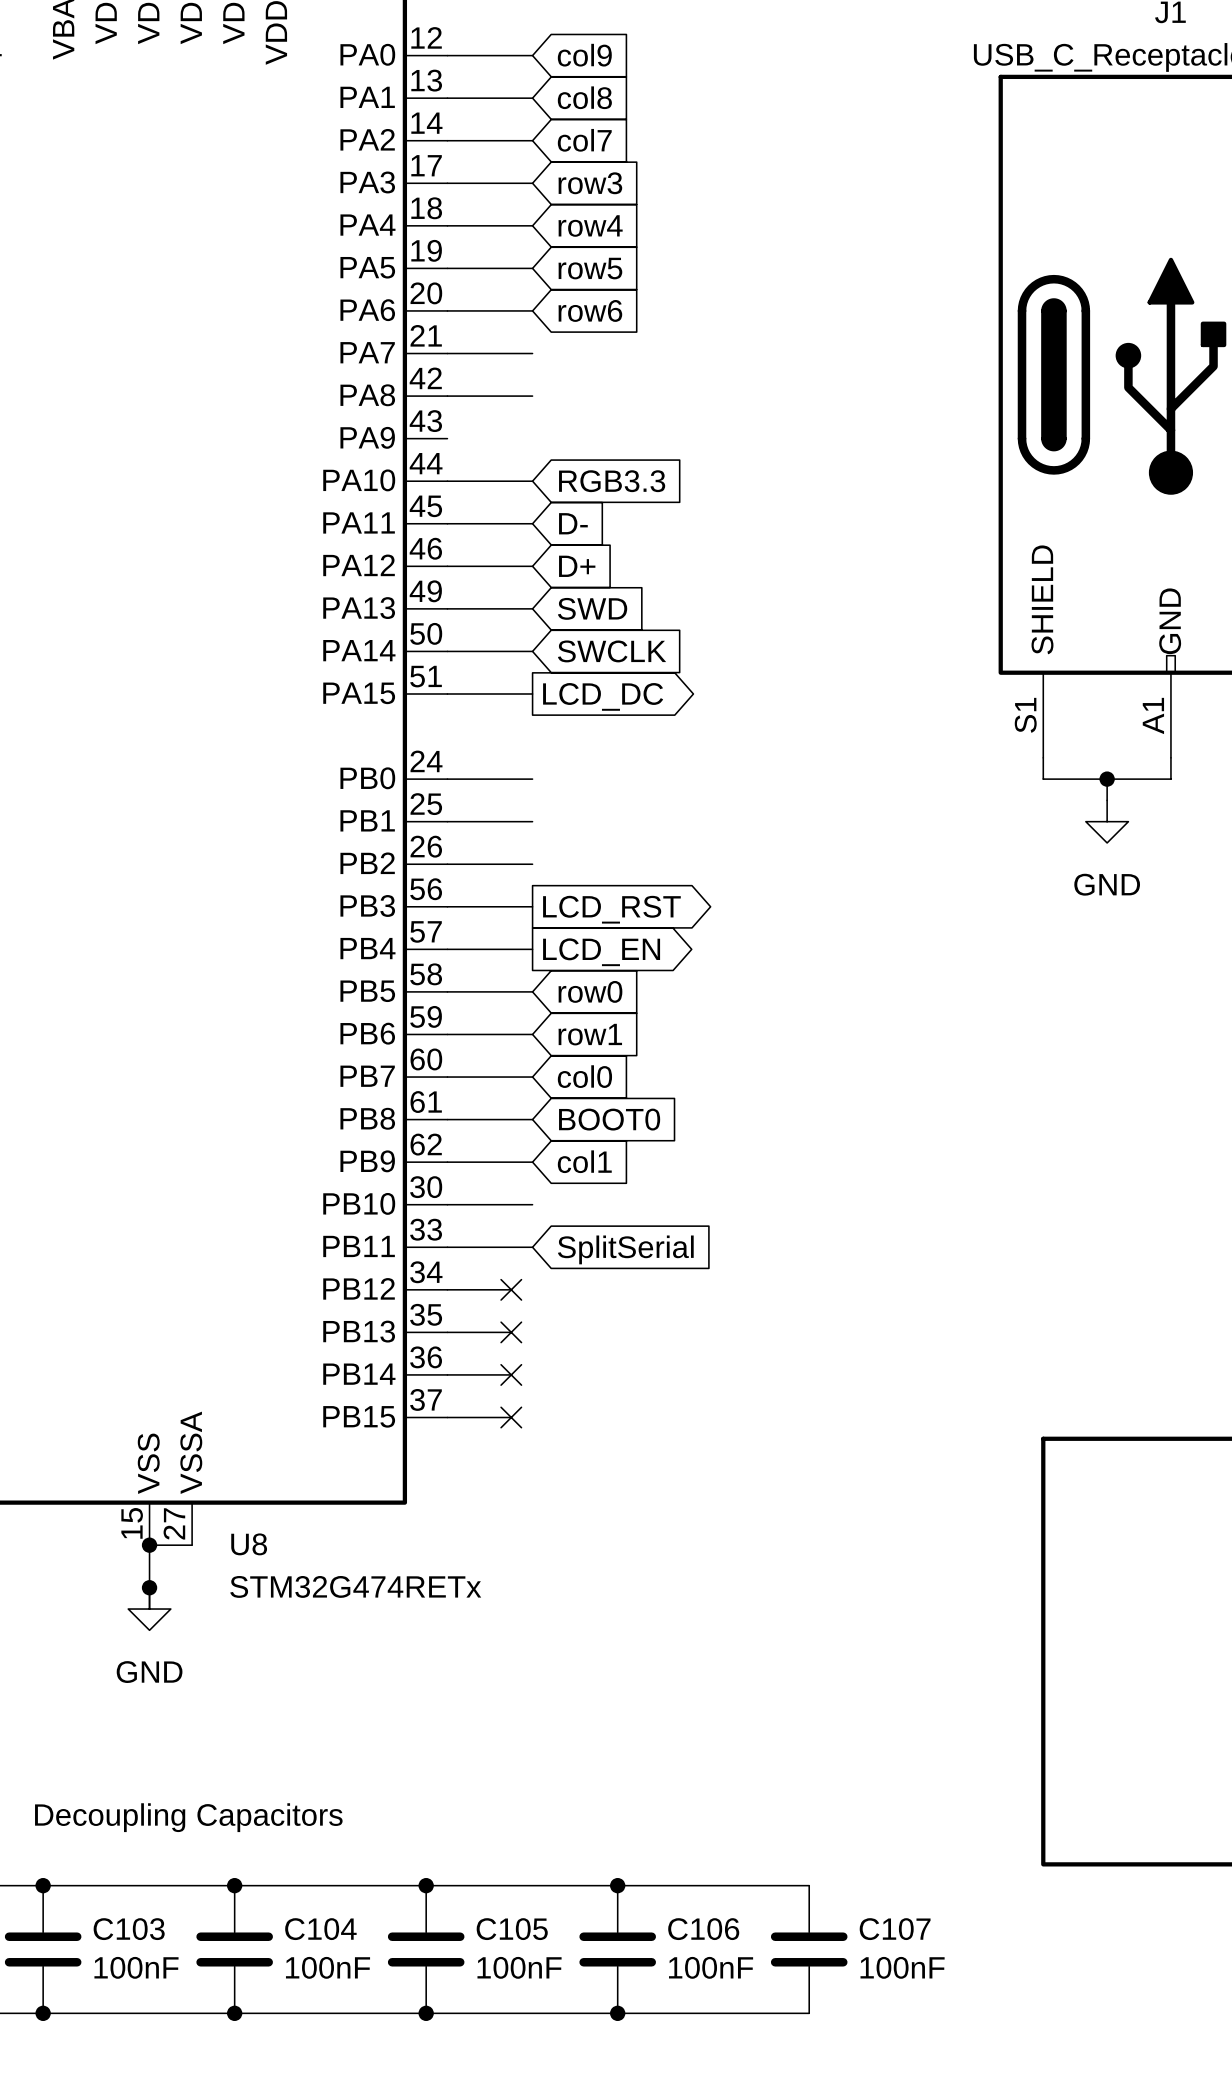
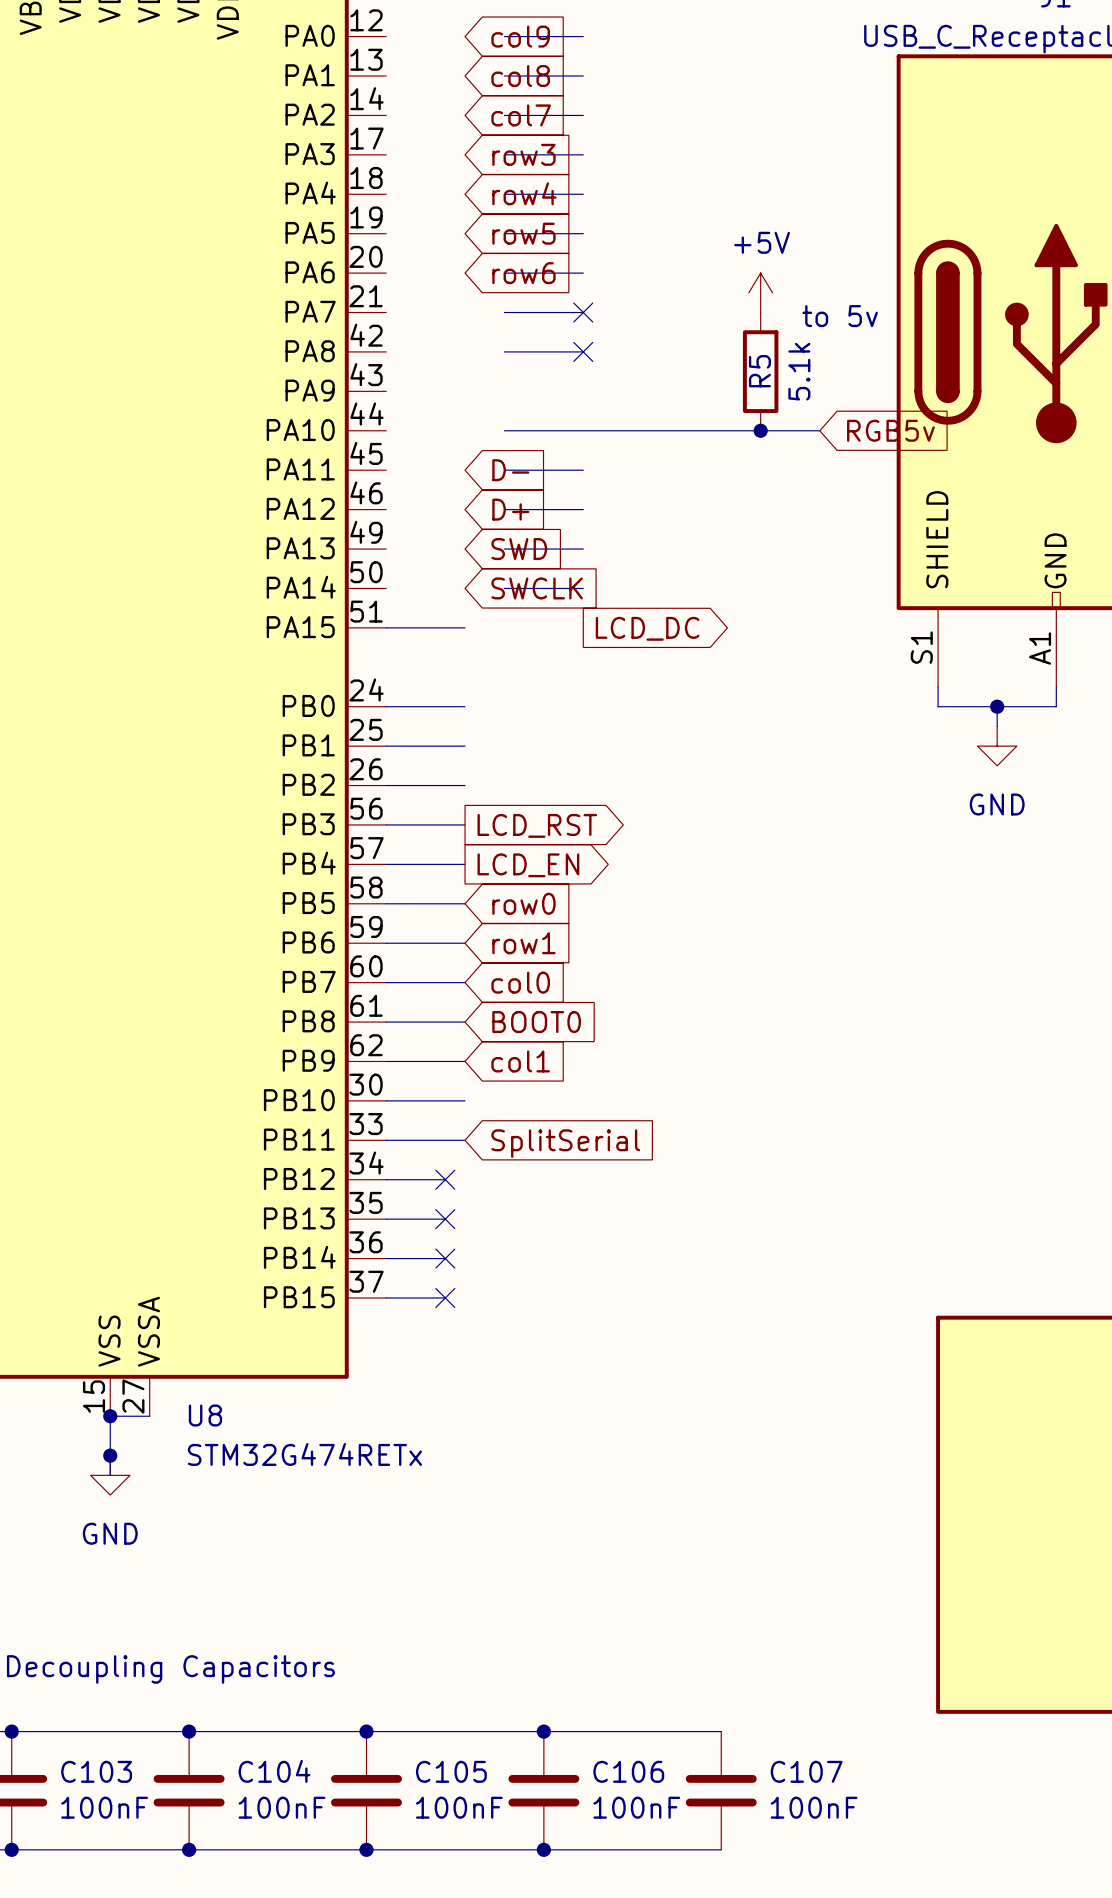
wire: (447, 55) (532, 55) -> (504, 36) (583, 36)
wire: (447, 98) (532, 98) -> (504, 76) (583, 76)
wire: (447, 140) (532, 140) -> (504, 115) (583, 115)
wire: (447, 183) (532, 183) -> (504, 154) (583, 154)
wire: (447, 225) (532, 225) -> (504, 194) (583, 194)
wire: (447, 268) (532, 268) -> (504, 233) (583, 233)
wire: (447, 310) (532, 310) -> (504, 273) (583, 273)
power symbol: none -> +5V (760, 292)
wire: (447, 353) (532, 353) -> (504, 312) (583, 312)
no-connect mark: none -> (583, 312)
text: none -> to 5v (840, 316)
wire: (447, 396) (532, 396) -> (504, 351) (583, 351)
no-connect mark: none -> (583, 351)
R5: none -> 5.1k (760, 371)
wire: (447, 481) (532, 481) -> none
wire: none -> (504, 430) (819, 430)
global label: RGB3.3 (612, 481) -> none
junction: none -> (760, 430)
global label: none -> RGB5v (890, 430)
wire: (447, 523) (532, 523) -> (504, 470) (583, 470)
wire: (447, 566) (532, 566) -> (504, 509) (583, 509)
wire: (447, 608) (532, 608) -> (504, 549) (583, 549)
wire: (447, 651) (532, 651) -> (504, 588) (583, 588)
global label position: LCD_DC (603, 696) -> LCD_DC (647, 628)

